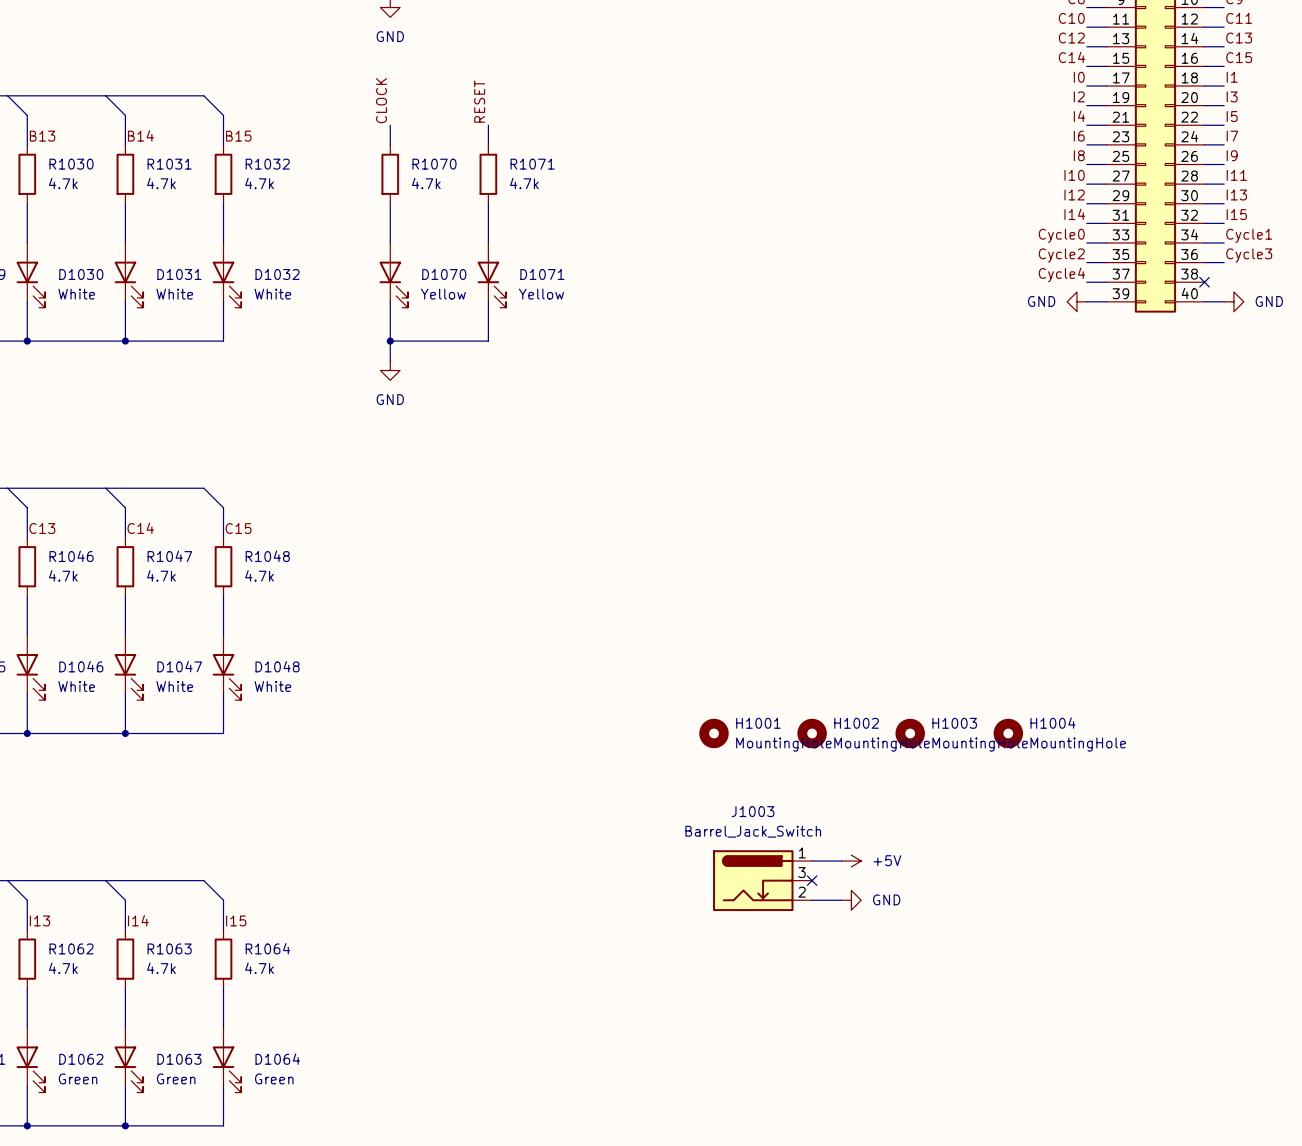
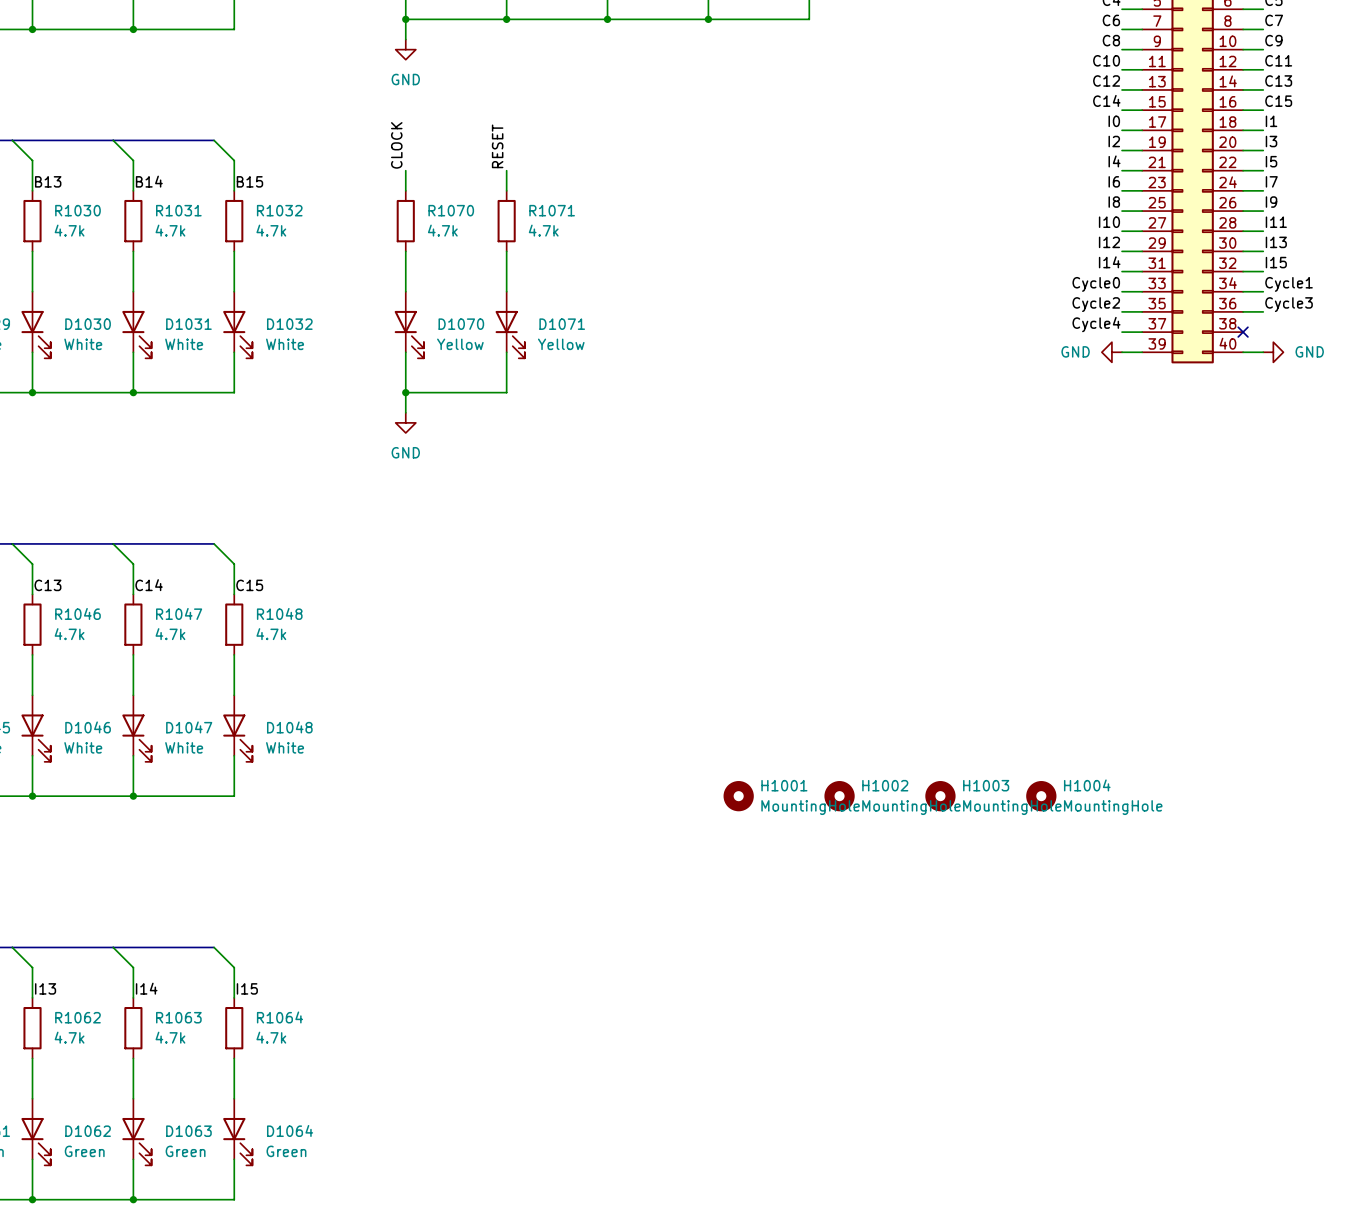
wire: (812, 861) (841, 861) -> none
power symbol: +5V (851, 861) -> none
J1003: Barrel_Jack_Switch (762, 880) -> none
no-connect mark: (812, 880) -> none
wire: (812, 900) (841, 900) -> none
power symbol: GND (851, 900) -> none

